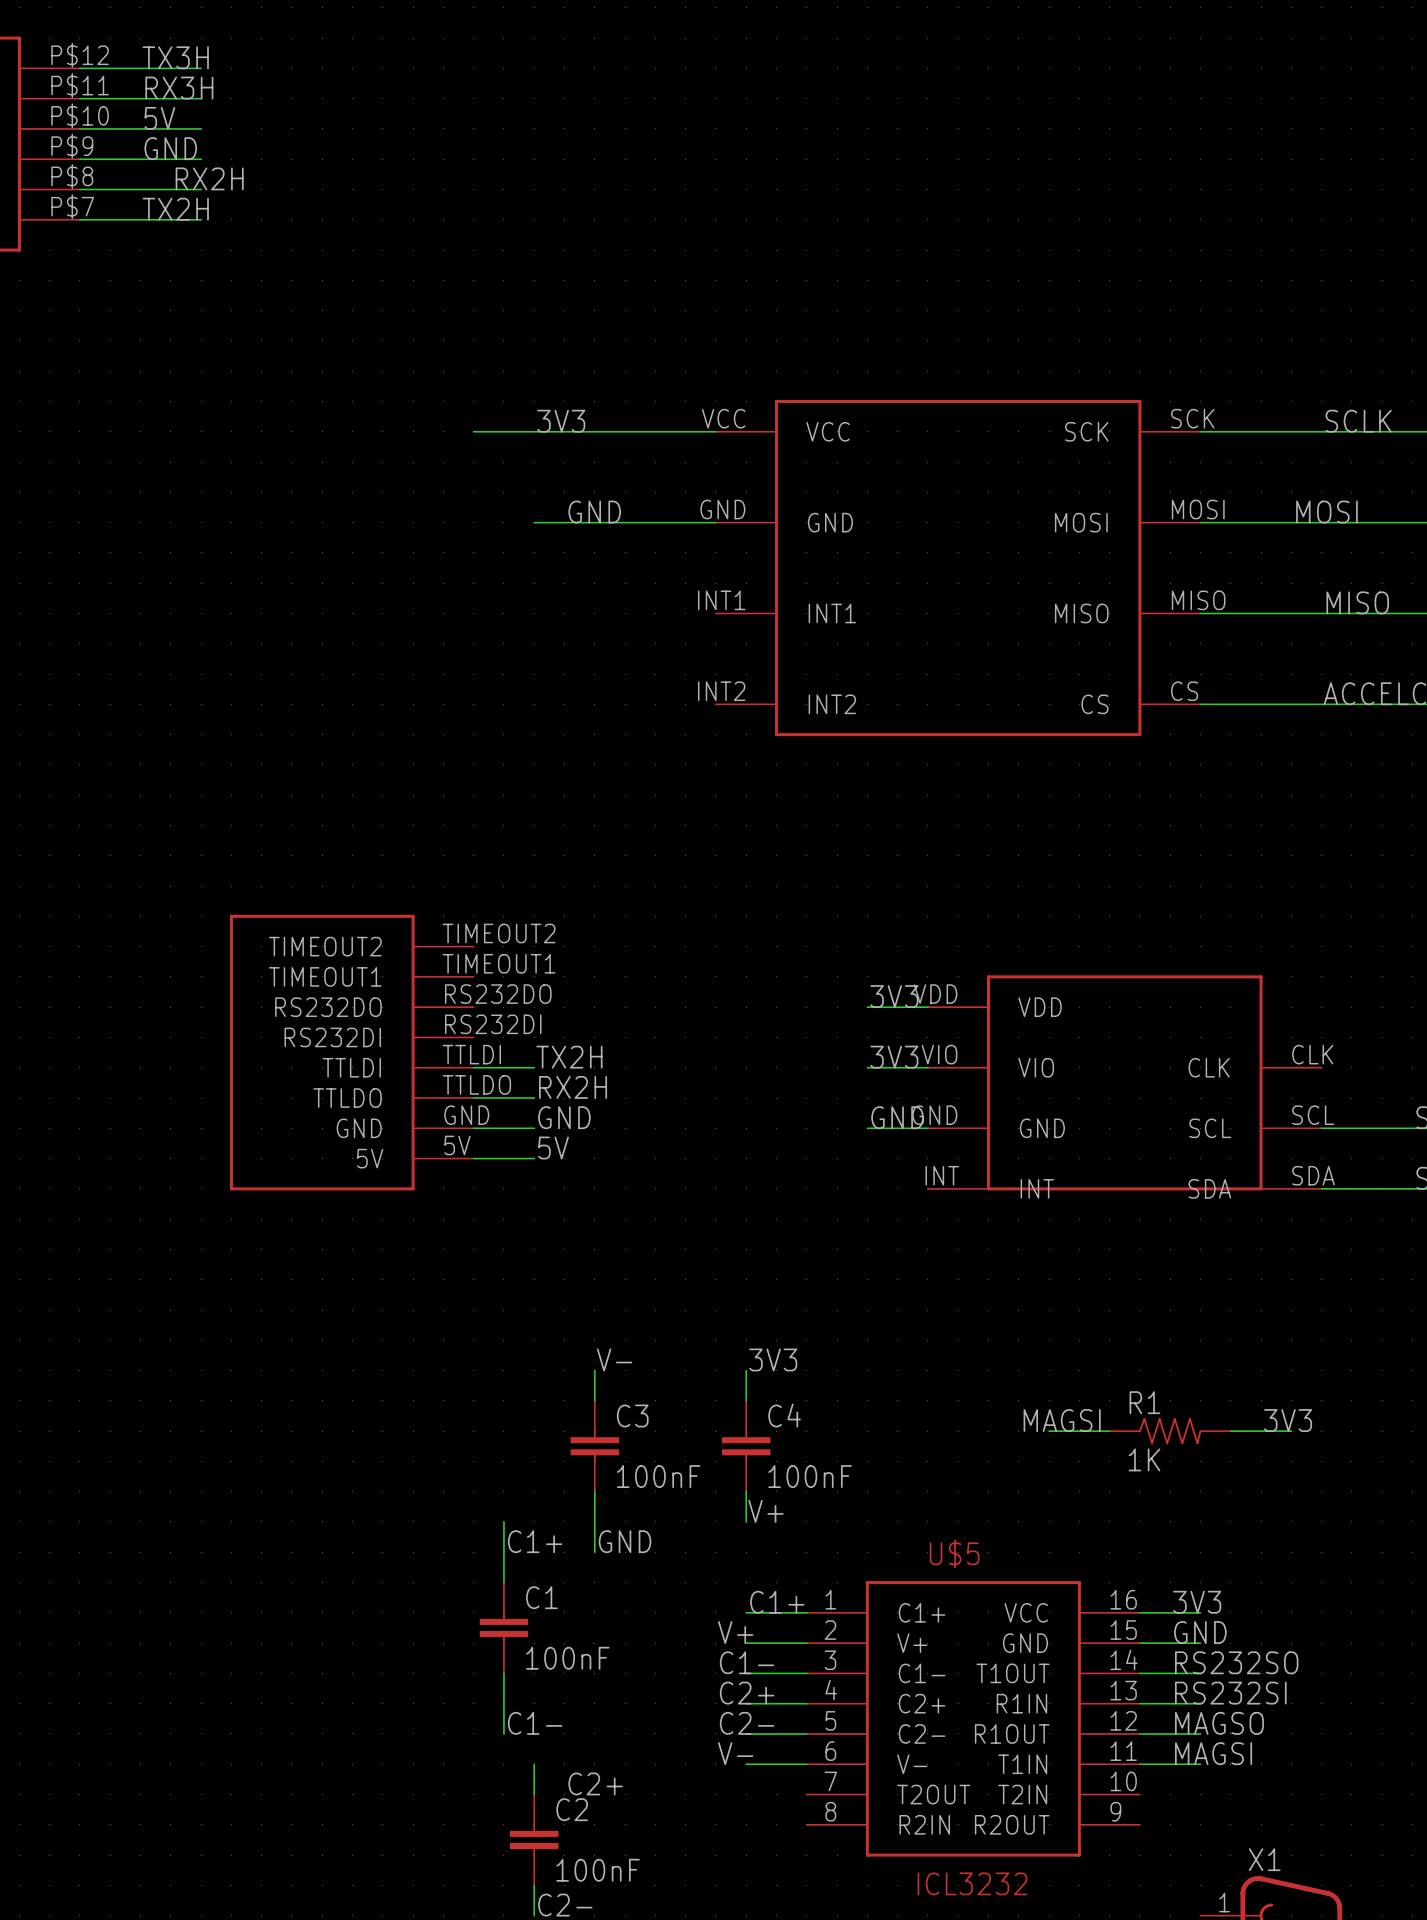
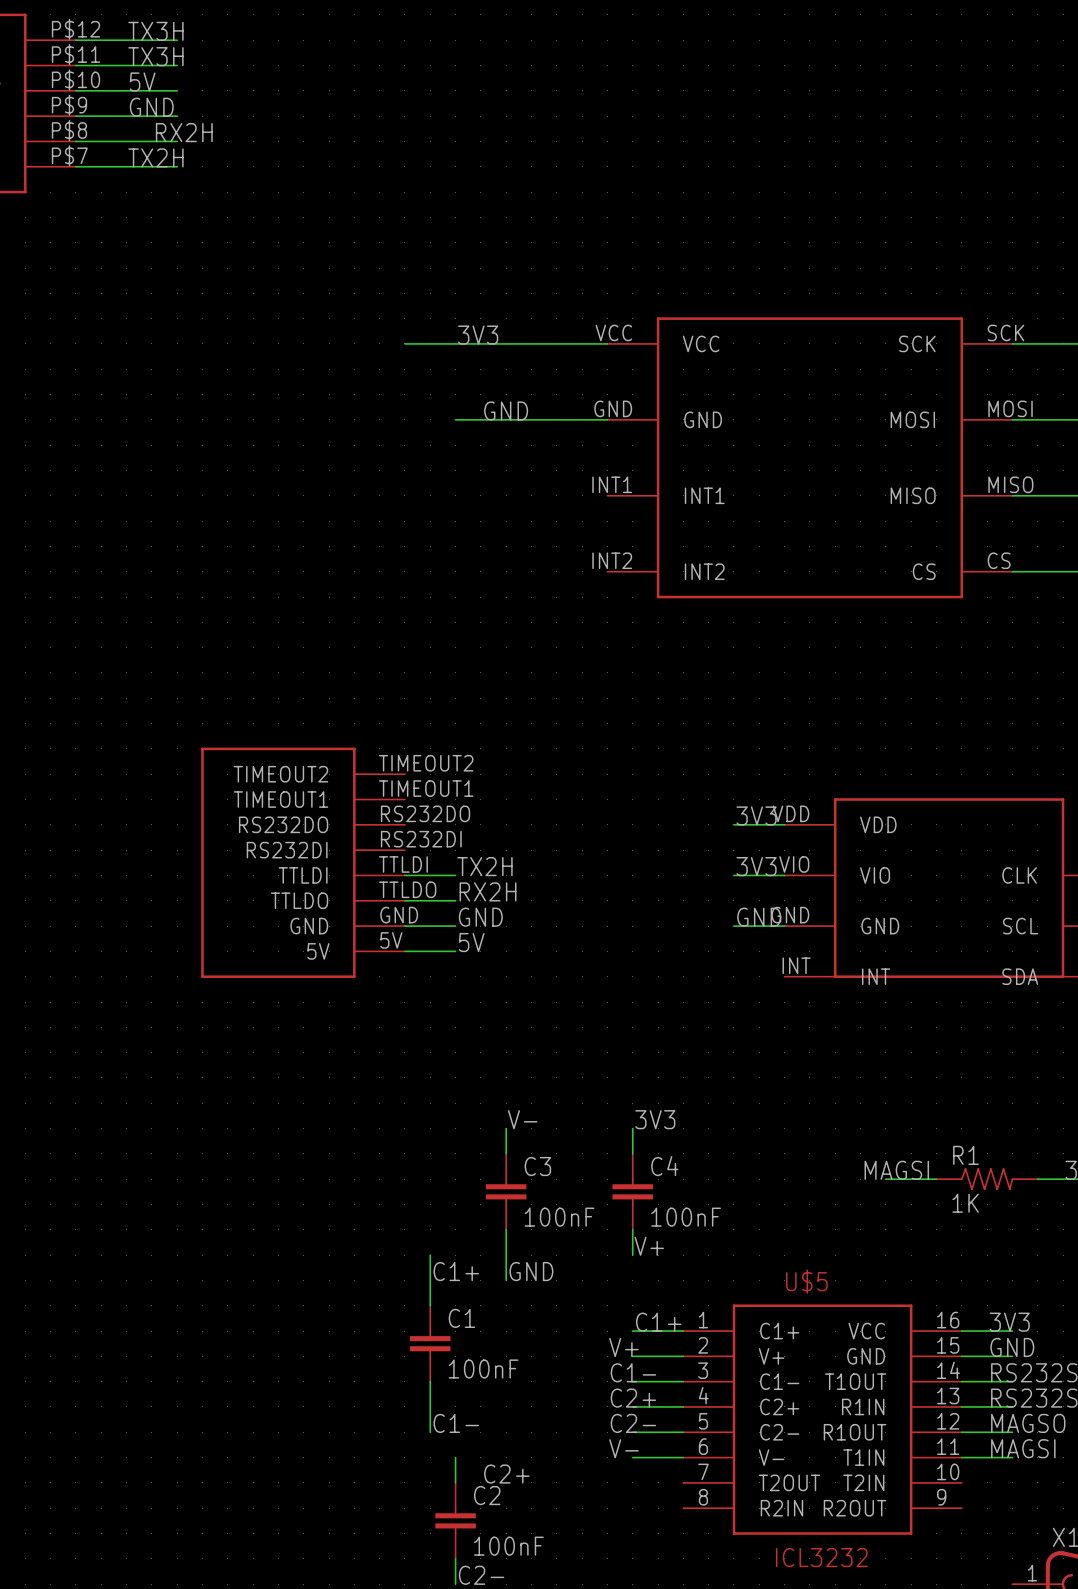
label: RX3H (179, 88) -> TX3H (155, 56)

